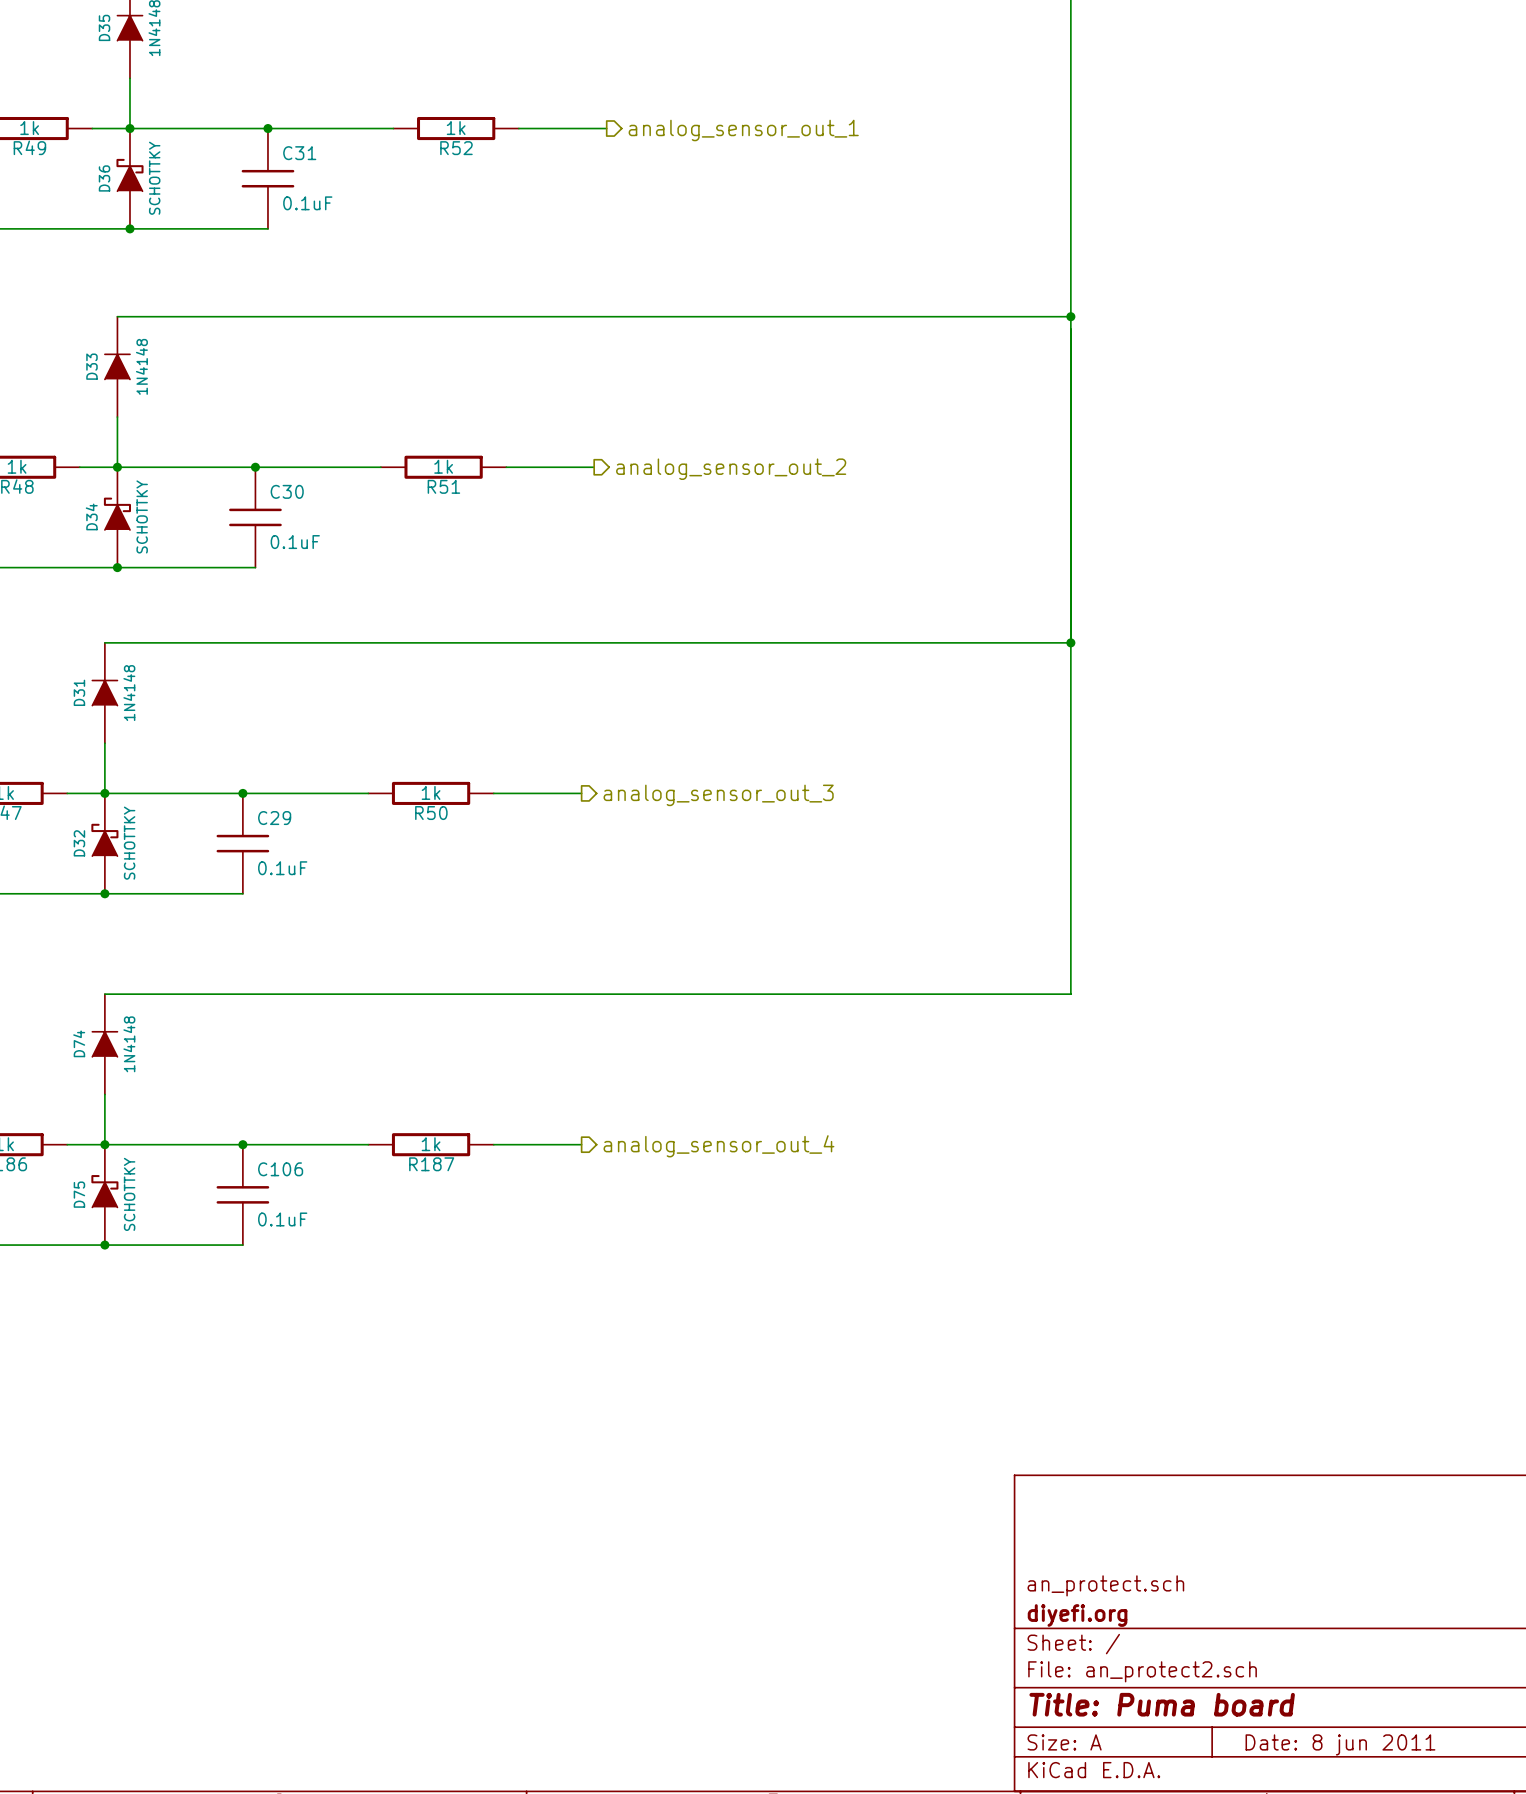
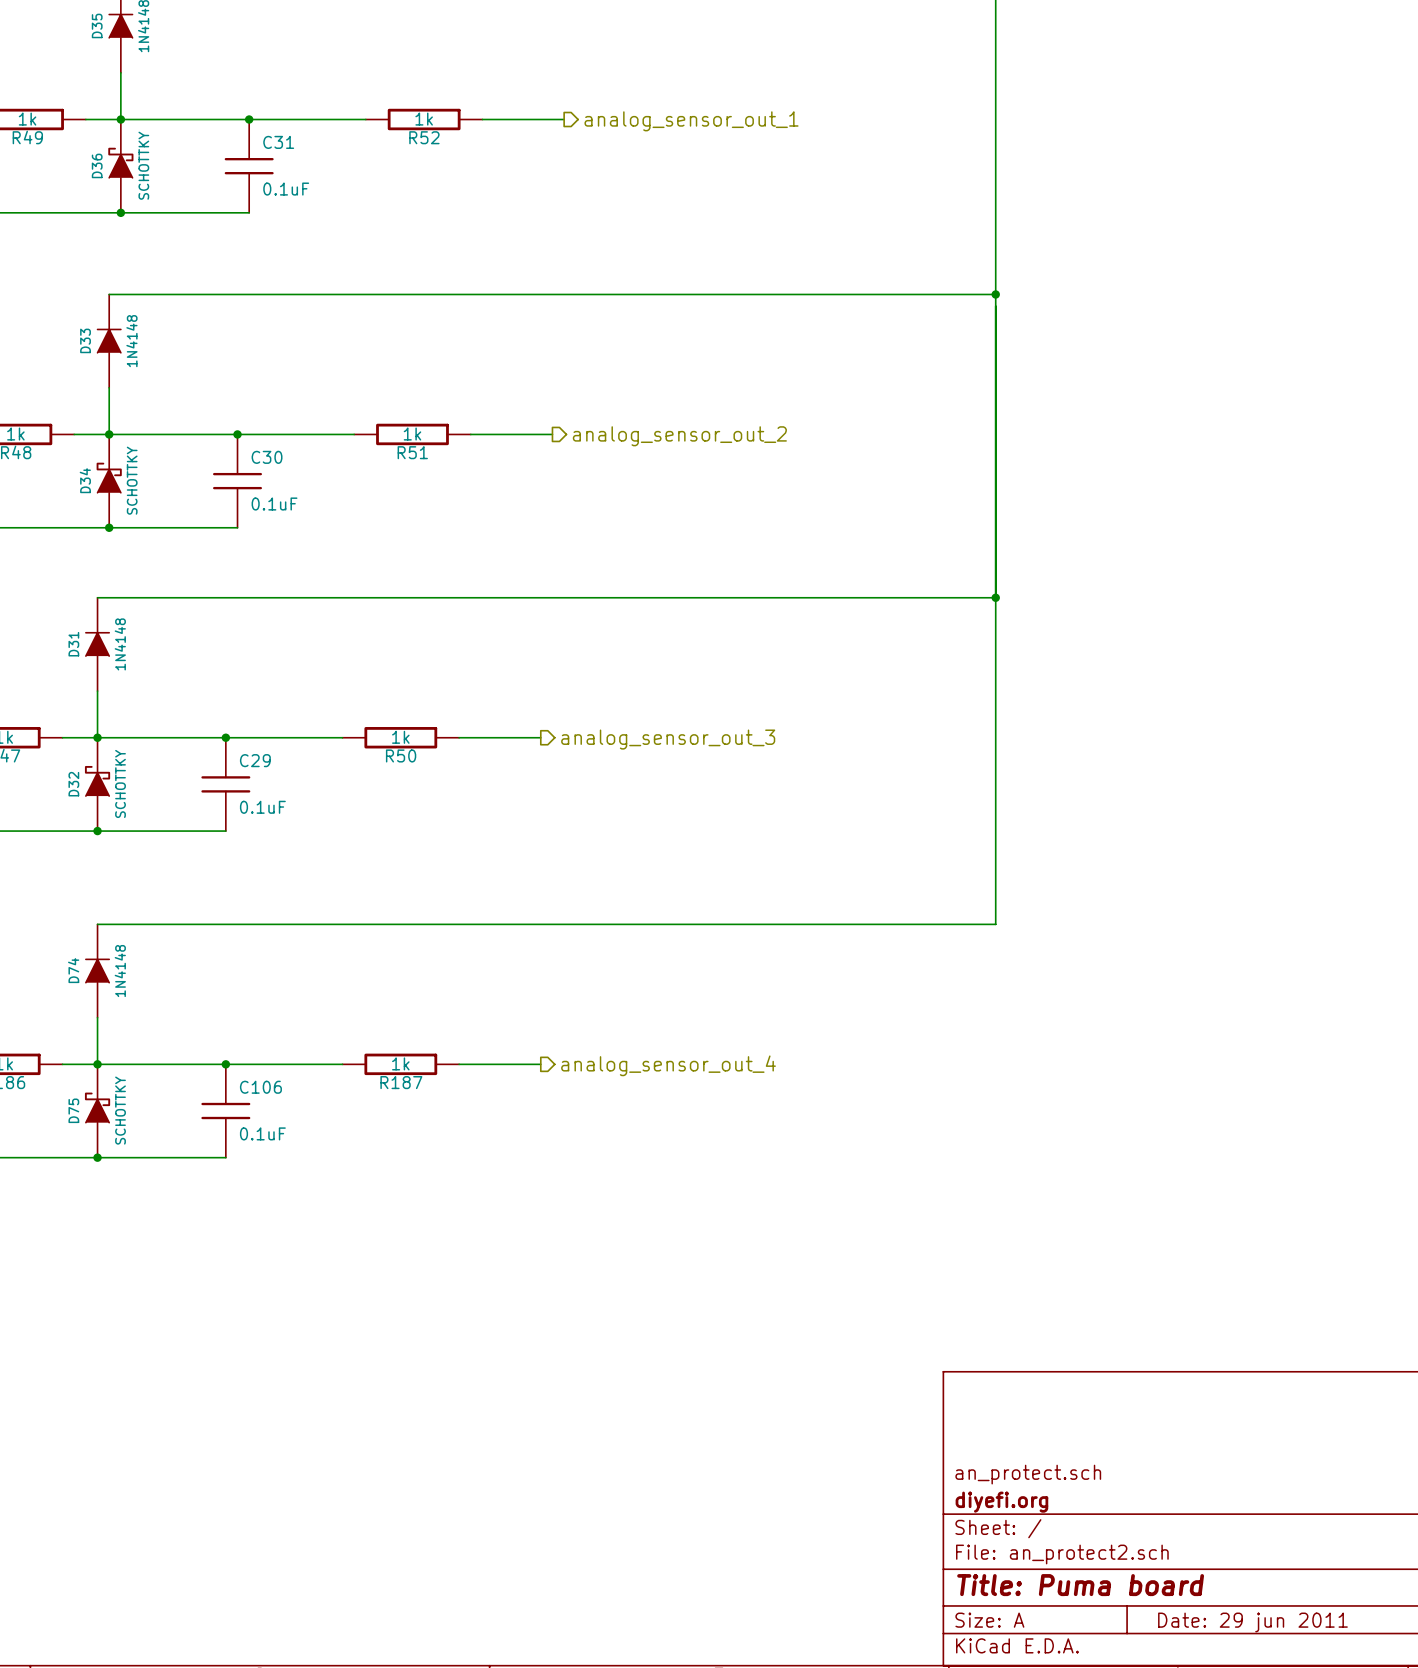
title block: Date: 8 jun 2011 (1340, 1744) -> Date: 29 jun 2011 (1252, 1622)

